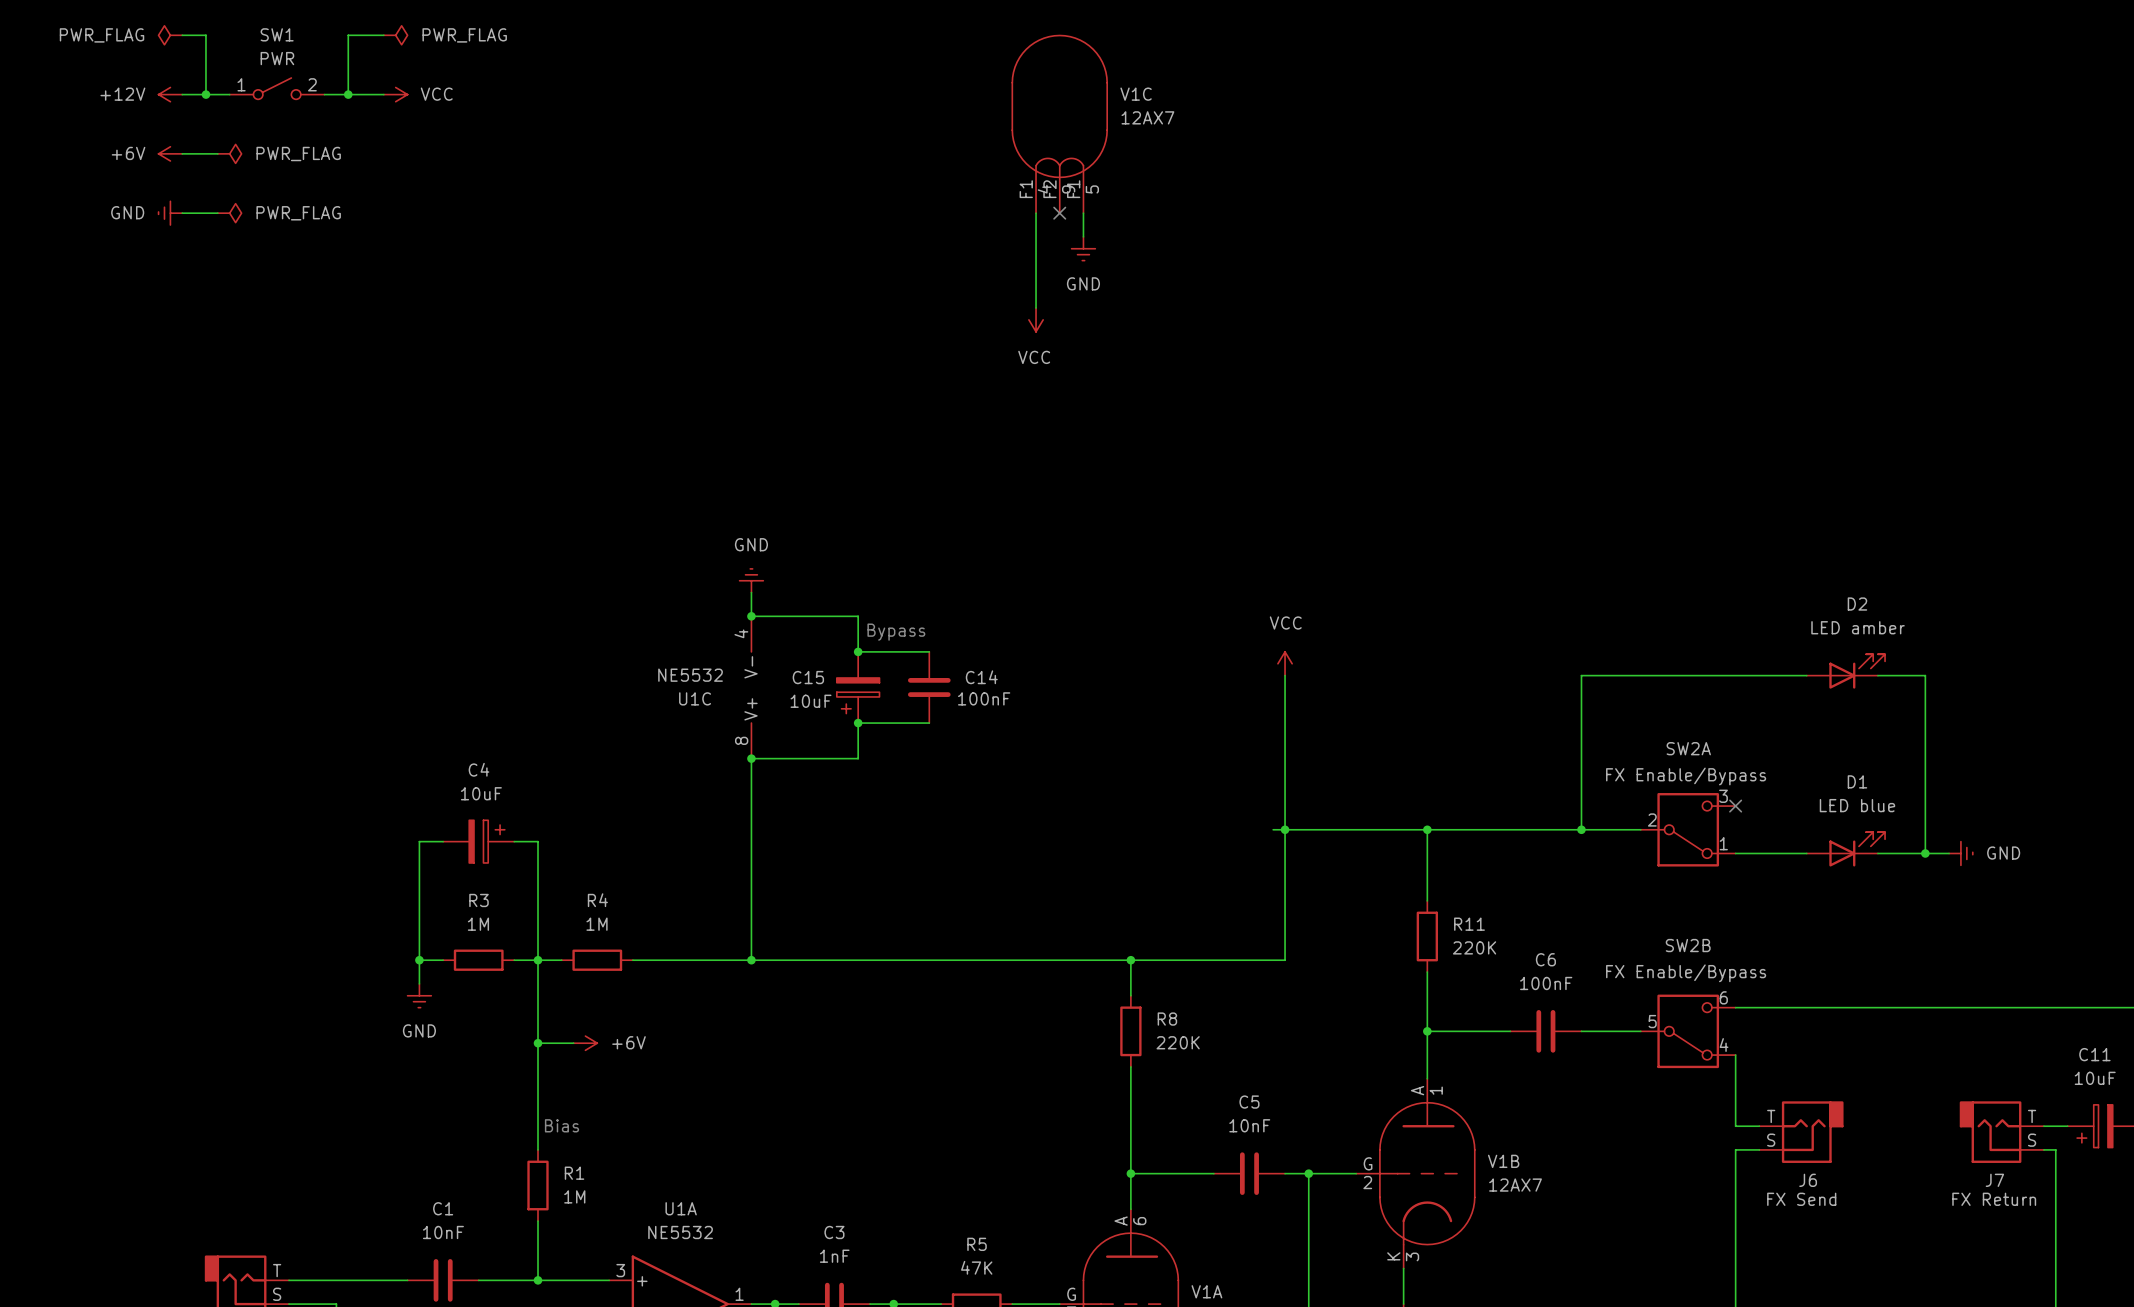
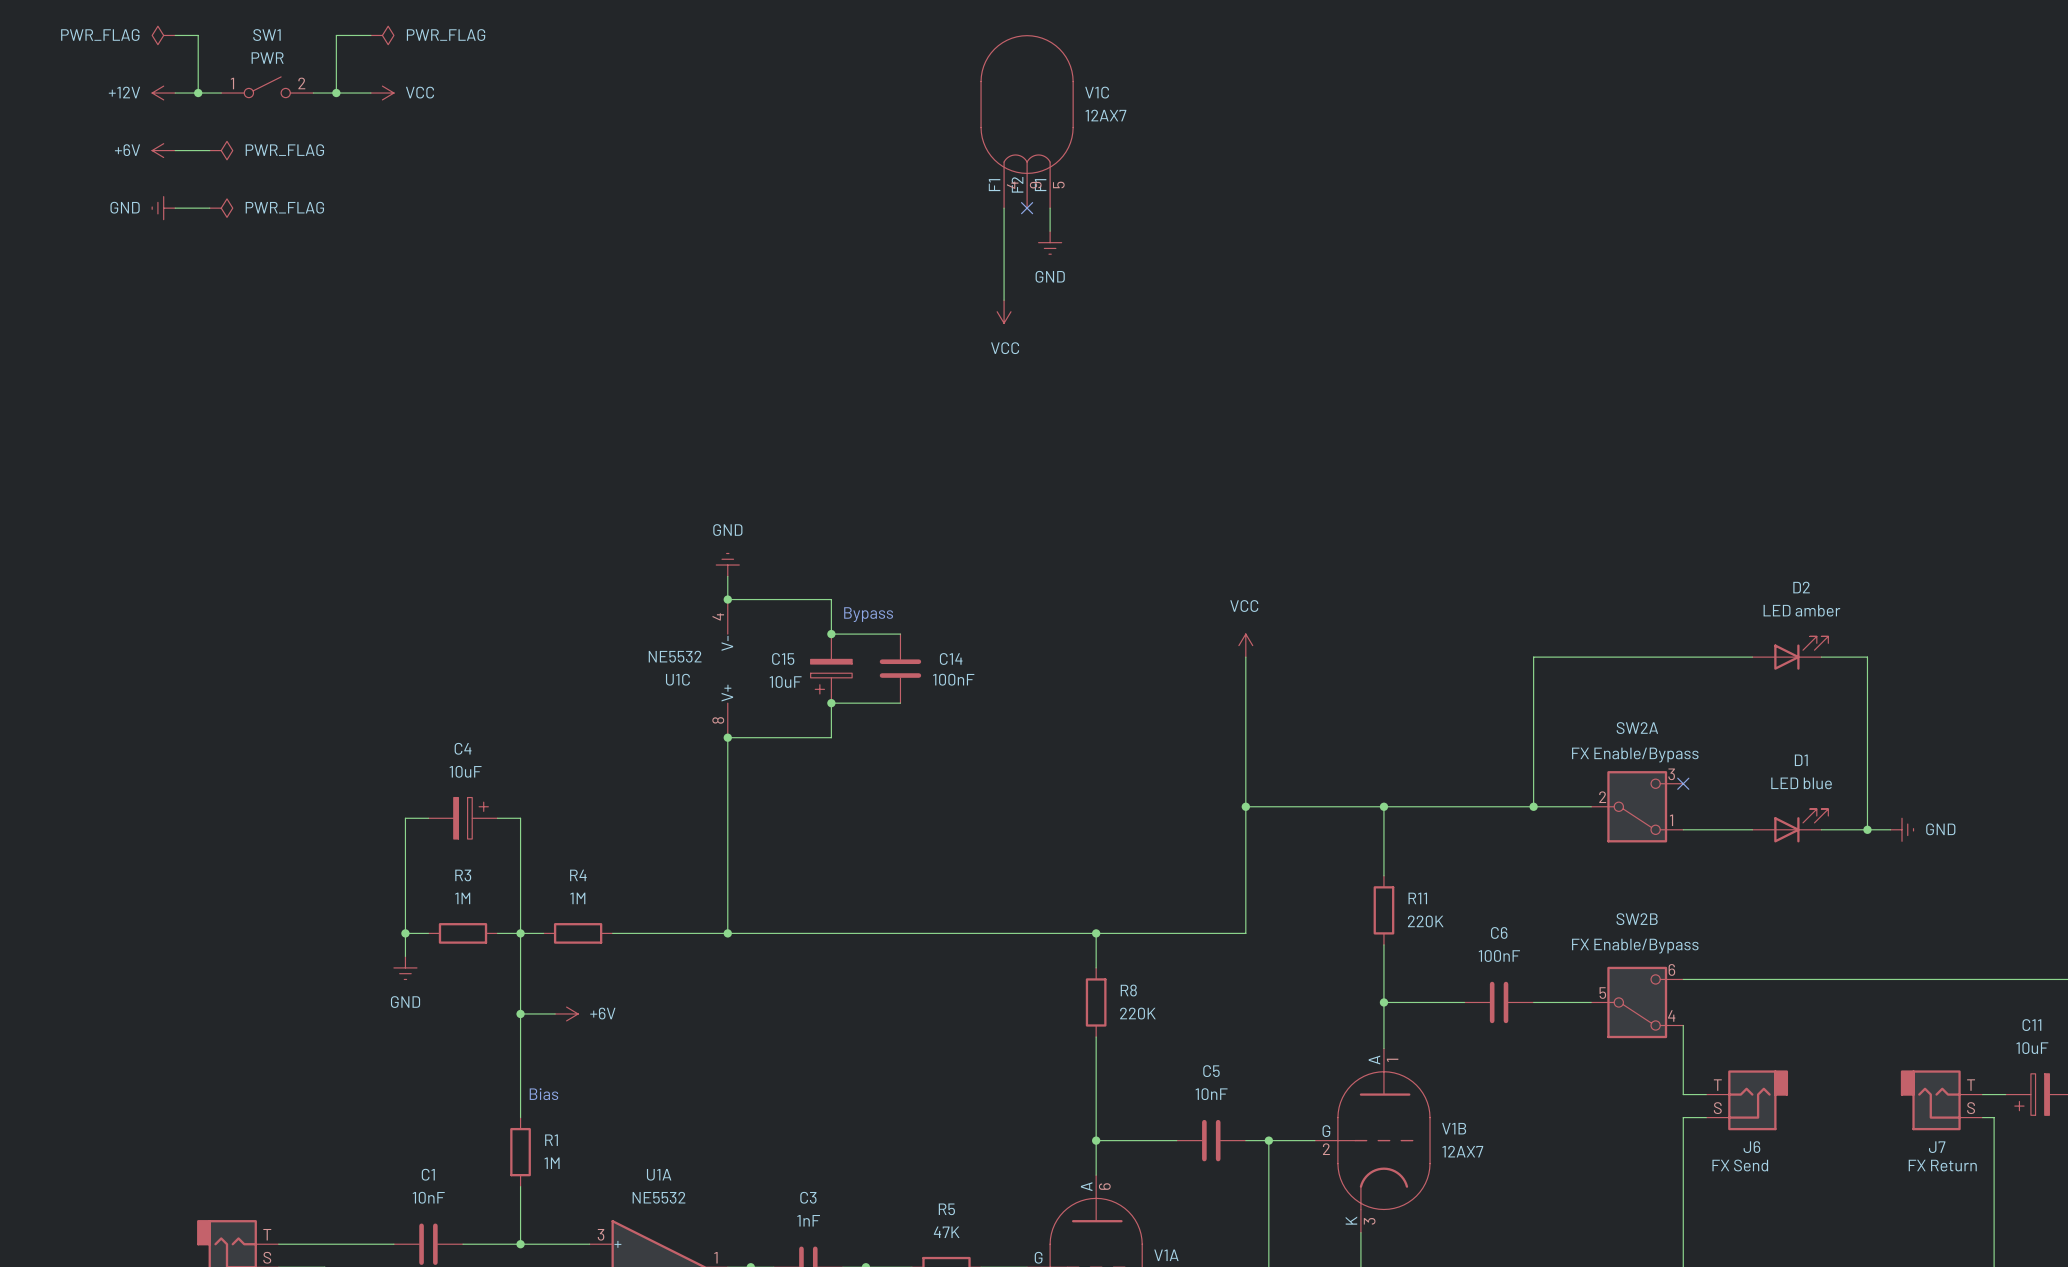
wire: (1273, 829) (1285, 829) -> none

